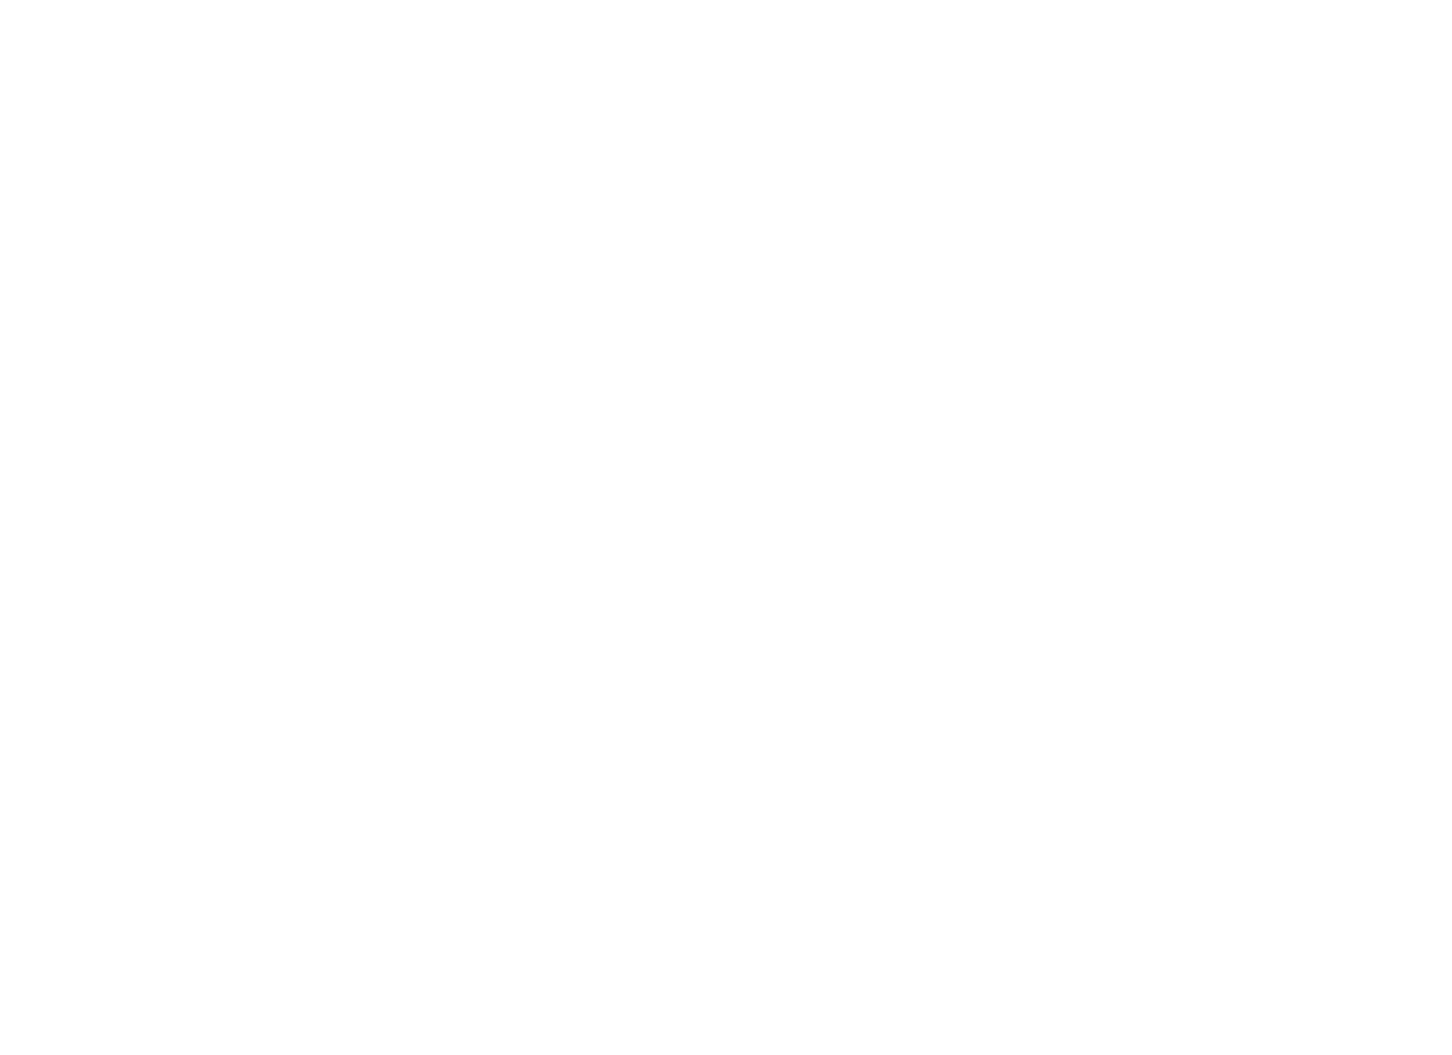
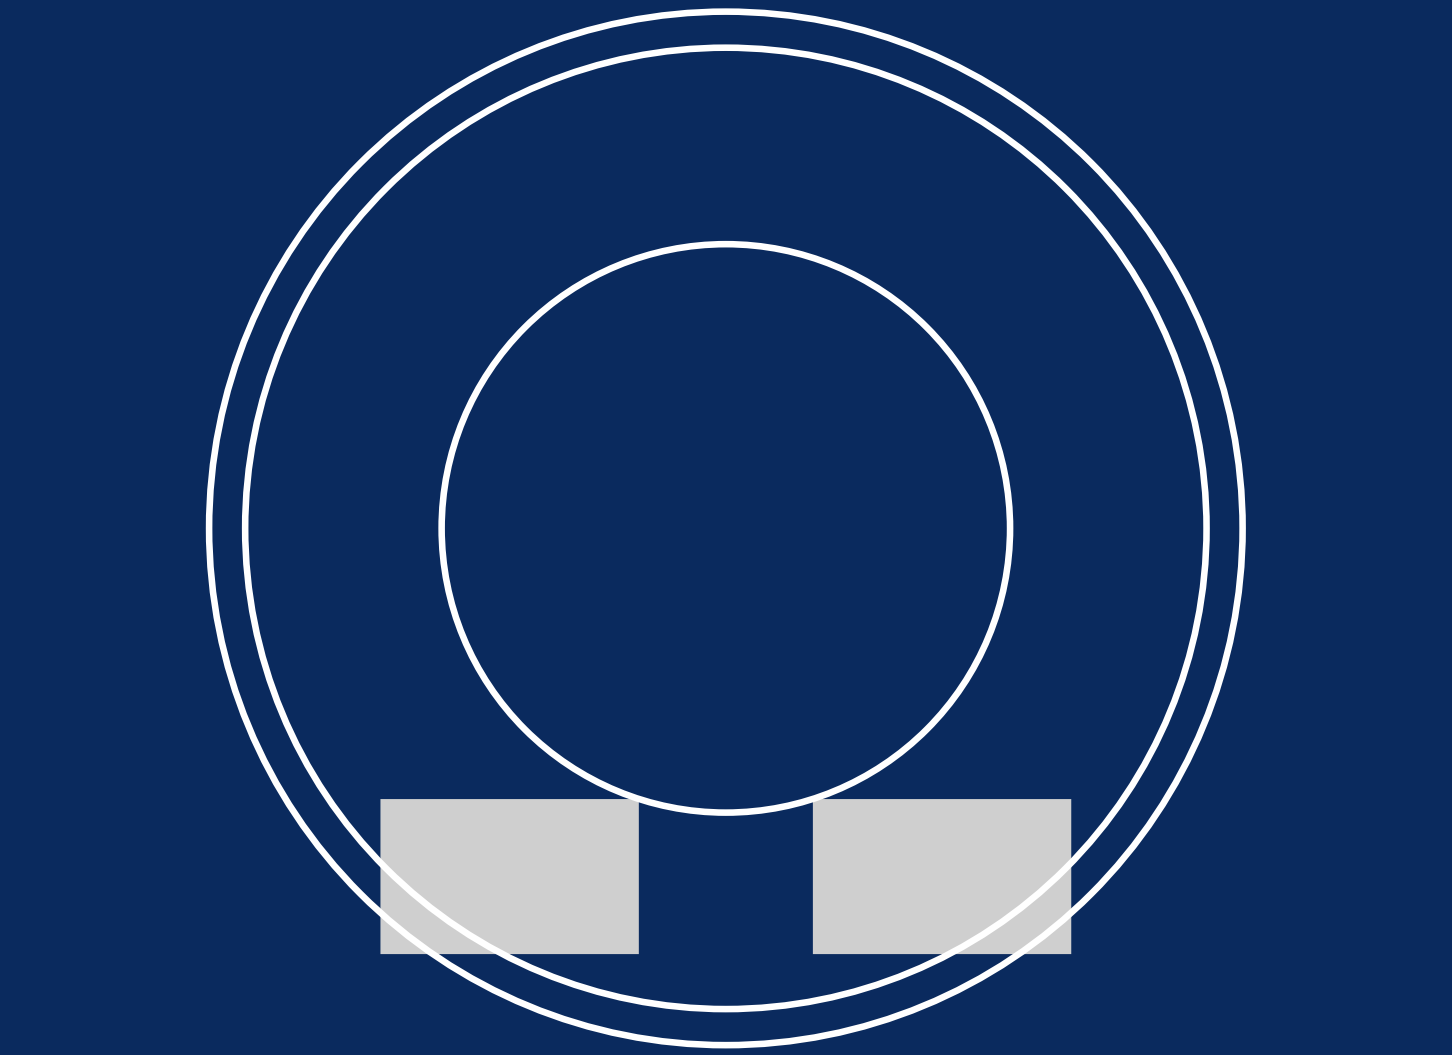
part: none -> (725, 528)

